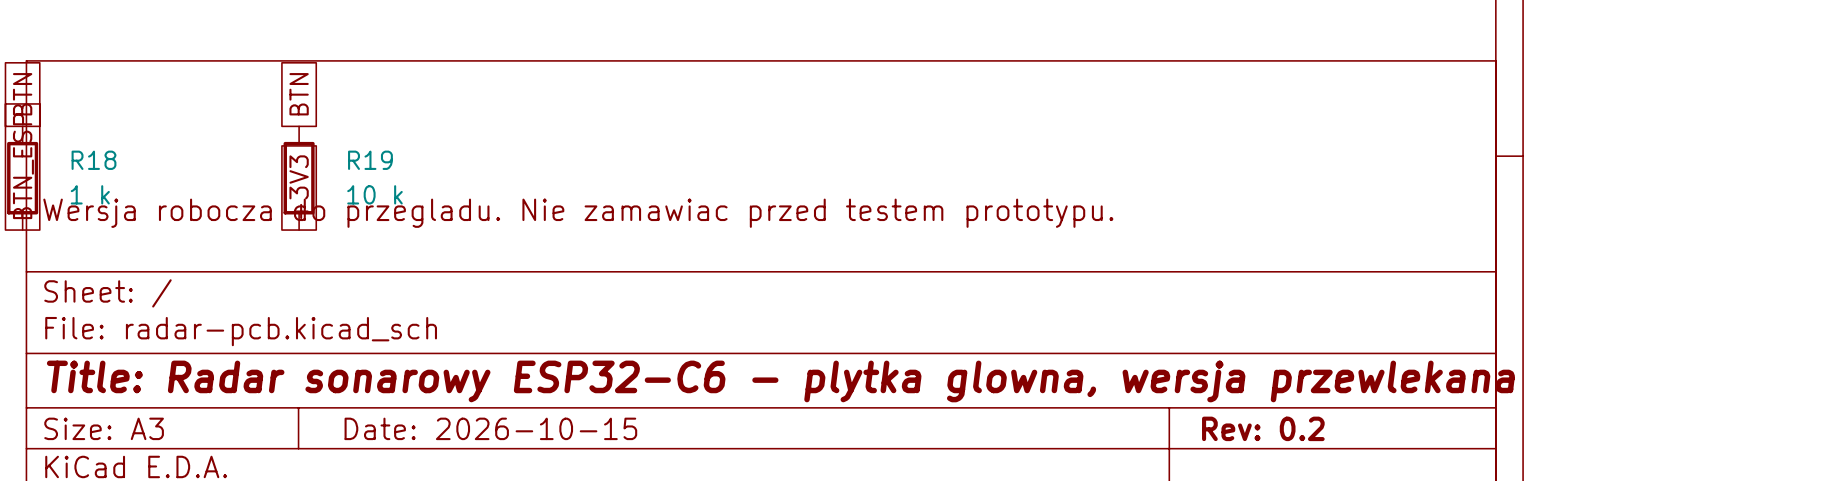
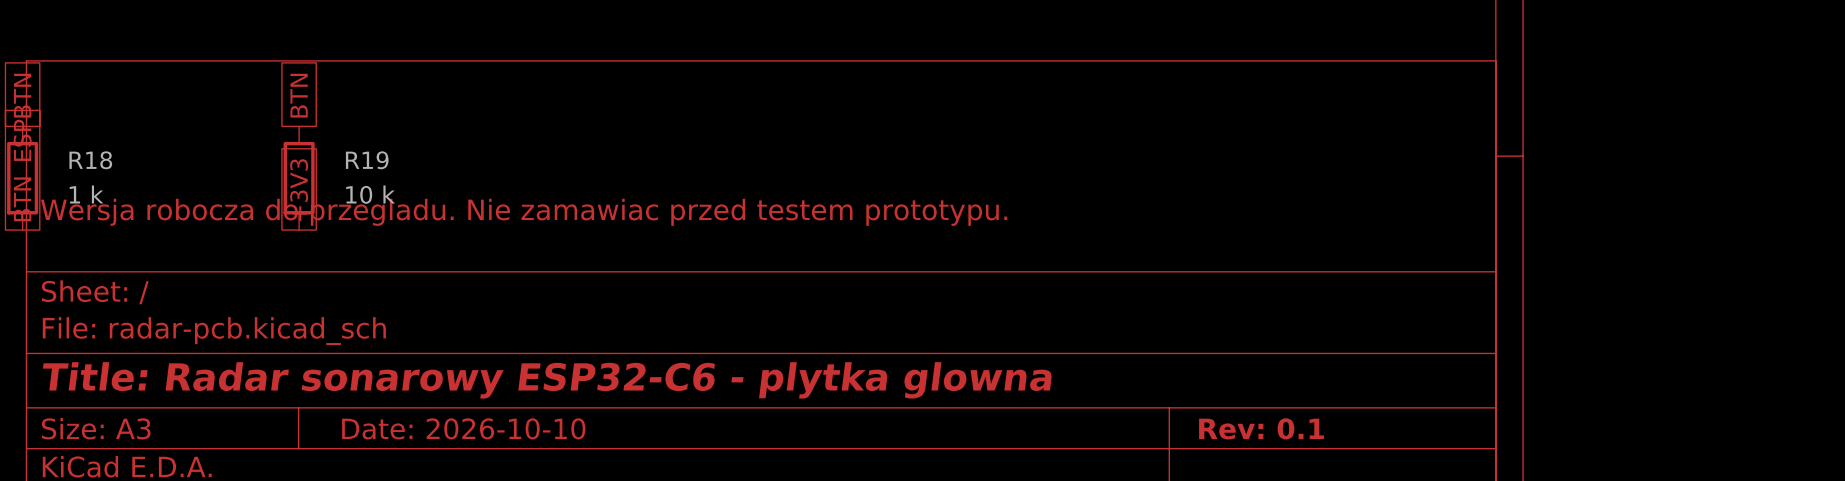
title block: Title: Radar sonarowy ESP32-C6 - plytka glowna, wersja przewlekana (780, 381) -> Title: Radar sonarowy ESP32-C6 - plytka glowna (547, 380)
title block: Date: 2026-10-15 (490, 428) -> Date: 2026-10-10 (463, 428)
title block: Rev: 0.2 (1263, 428) -> Rev: 0.1 (1261, 428)

